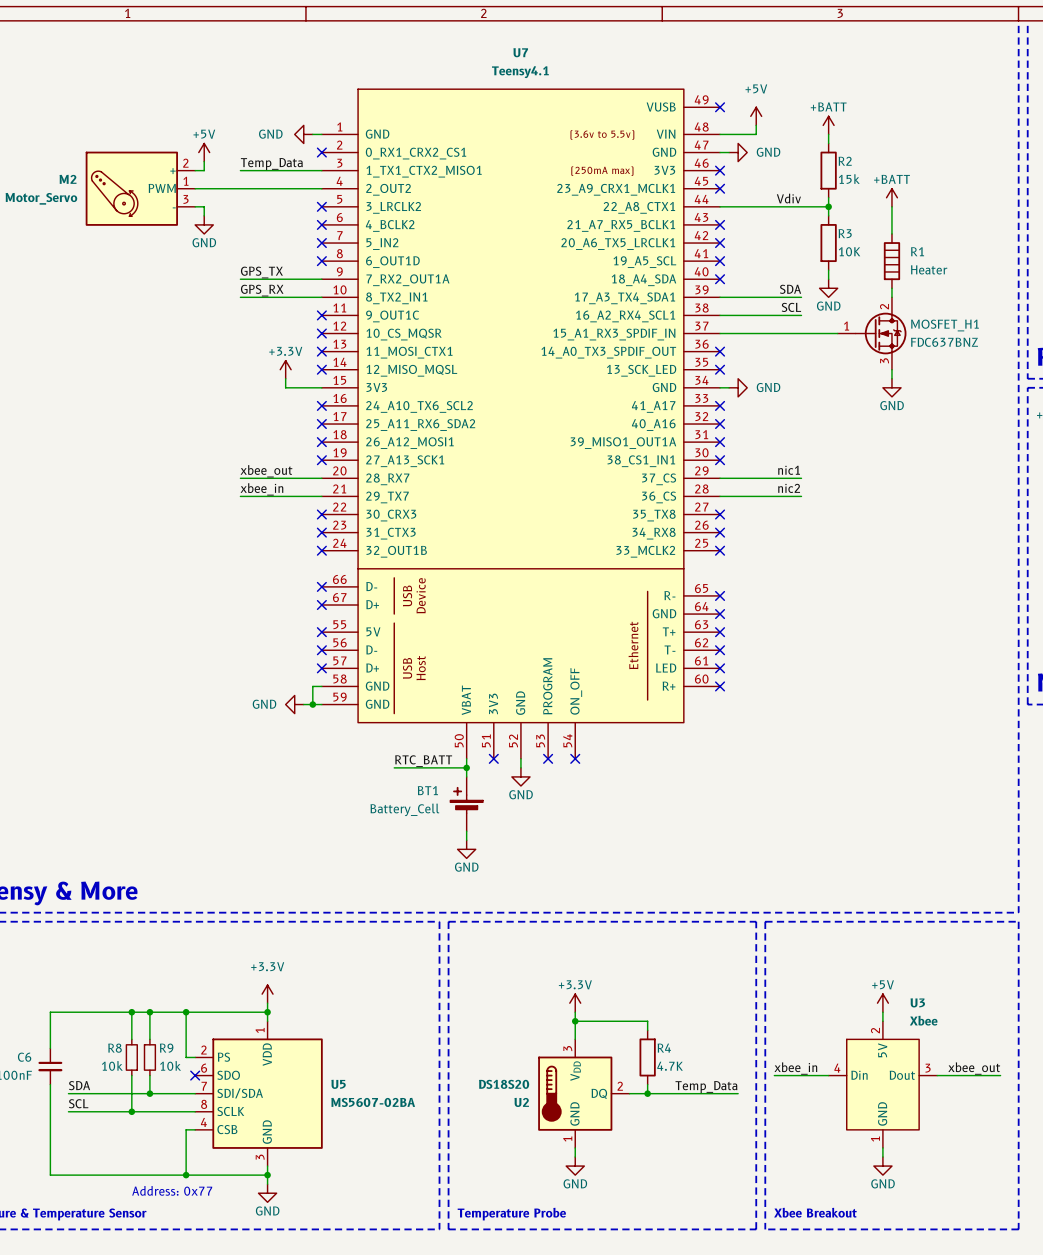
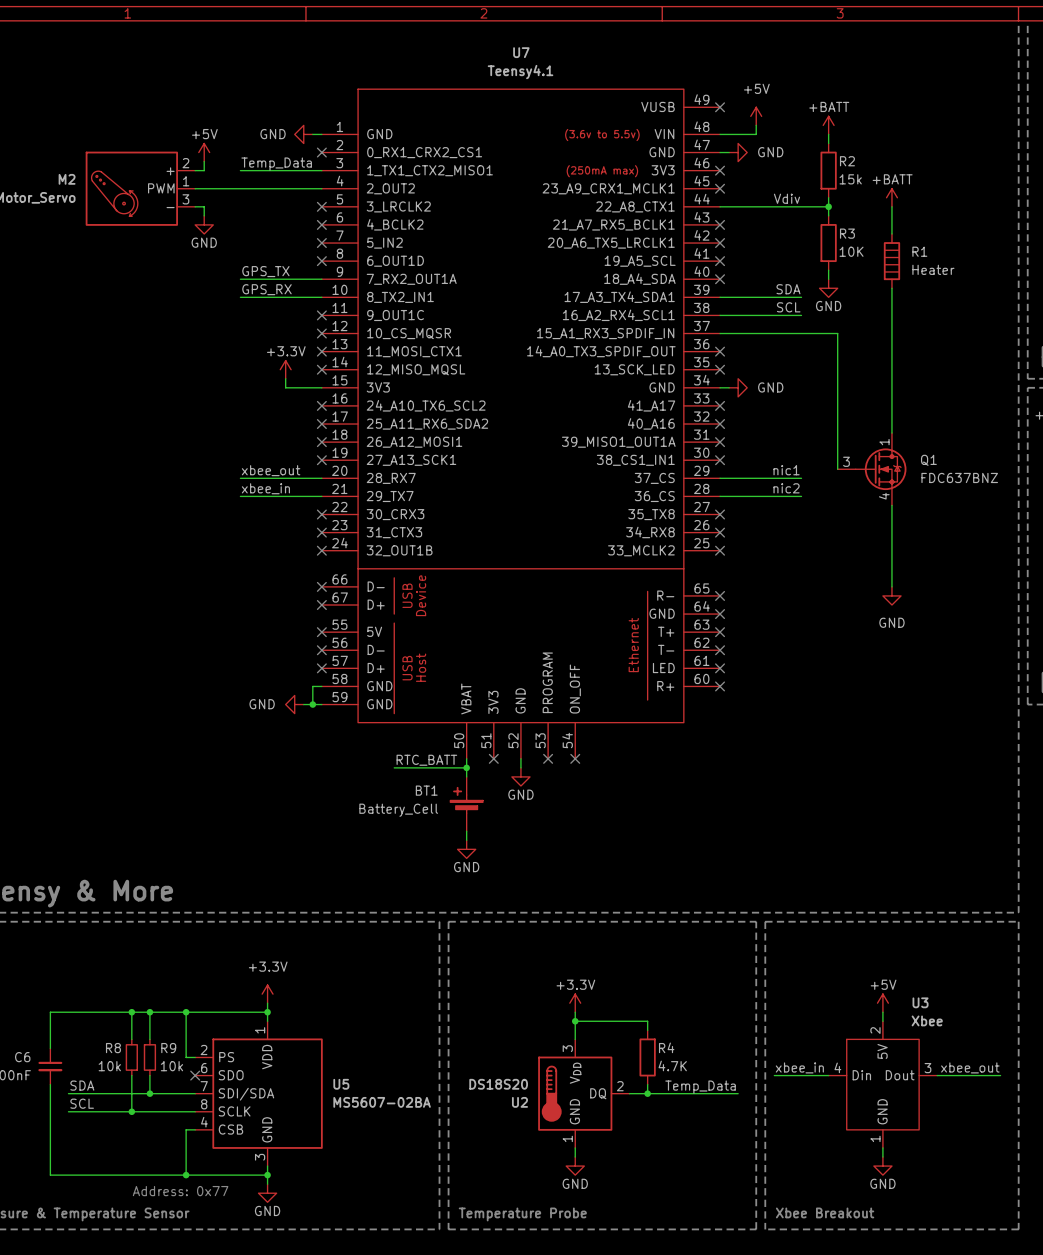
wire: none -> (837, 333) (837, 469)
MOSFET_H1: FDC637BNZ (872, 333) -> none
wire: none -> (891, 378) (891, 433)
power symbol: GND (891, 387) -> none
Q1: none -> FDC637BNZ (872, 469)
wire: none -> (891, 505) (891, 586)
power symbol: none -> GND (891, 595)

